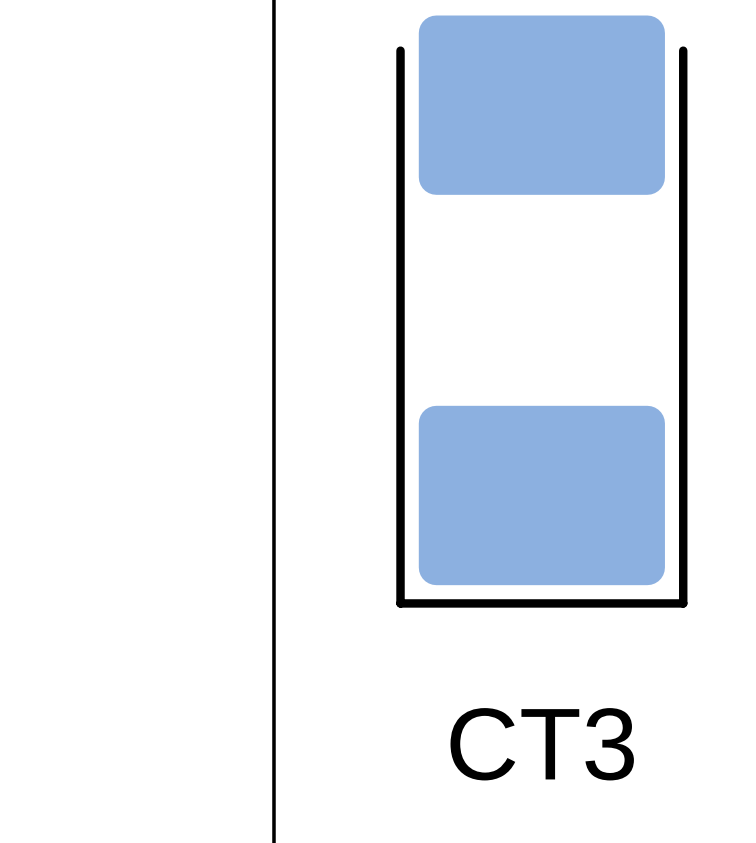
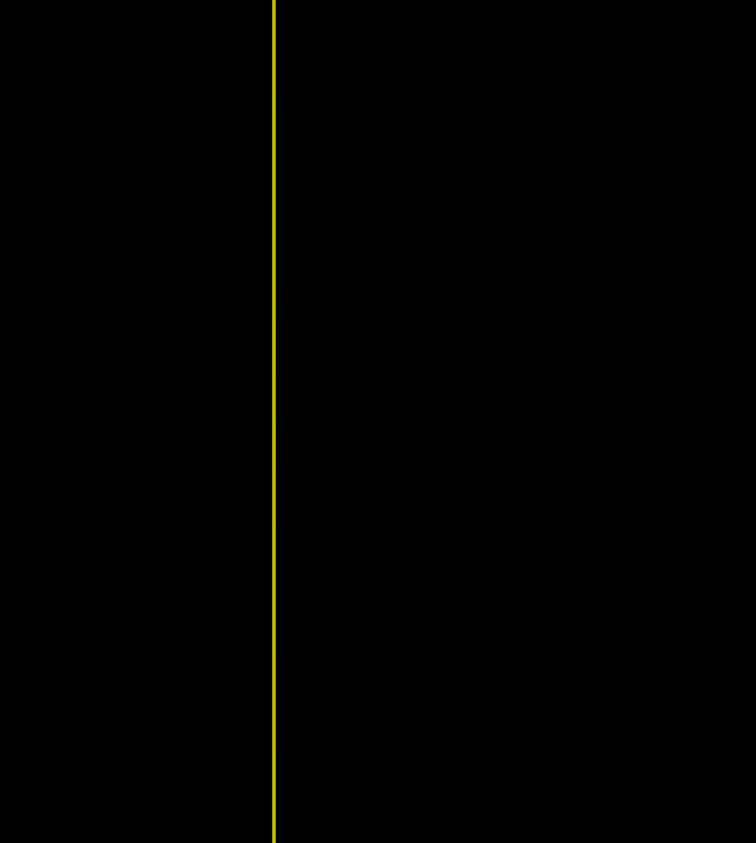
CT3: (541, 311) -> none

